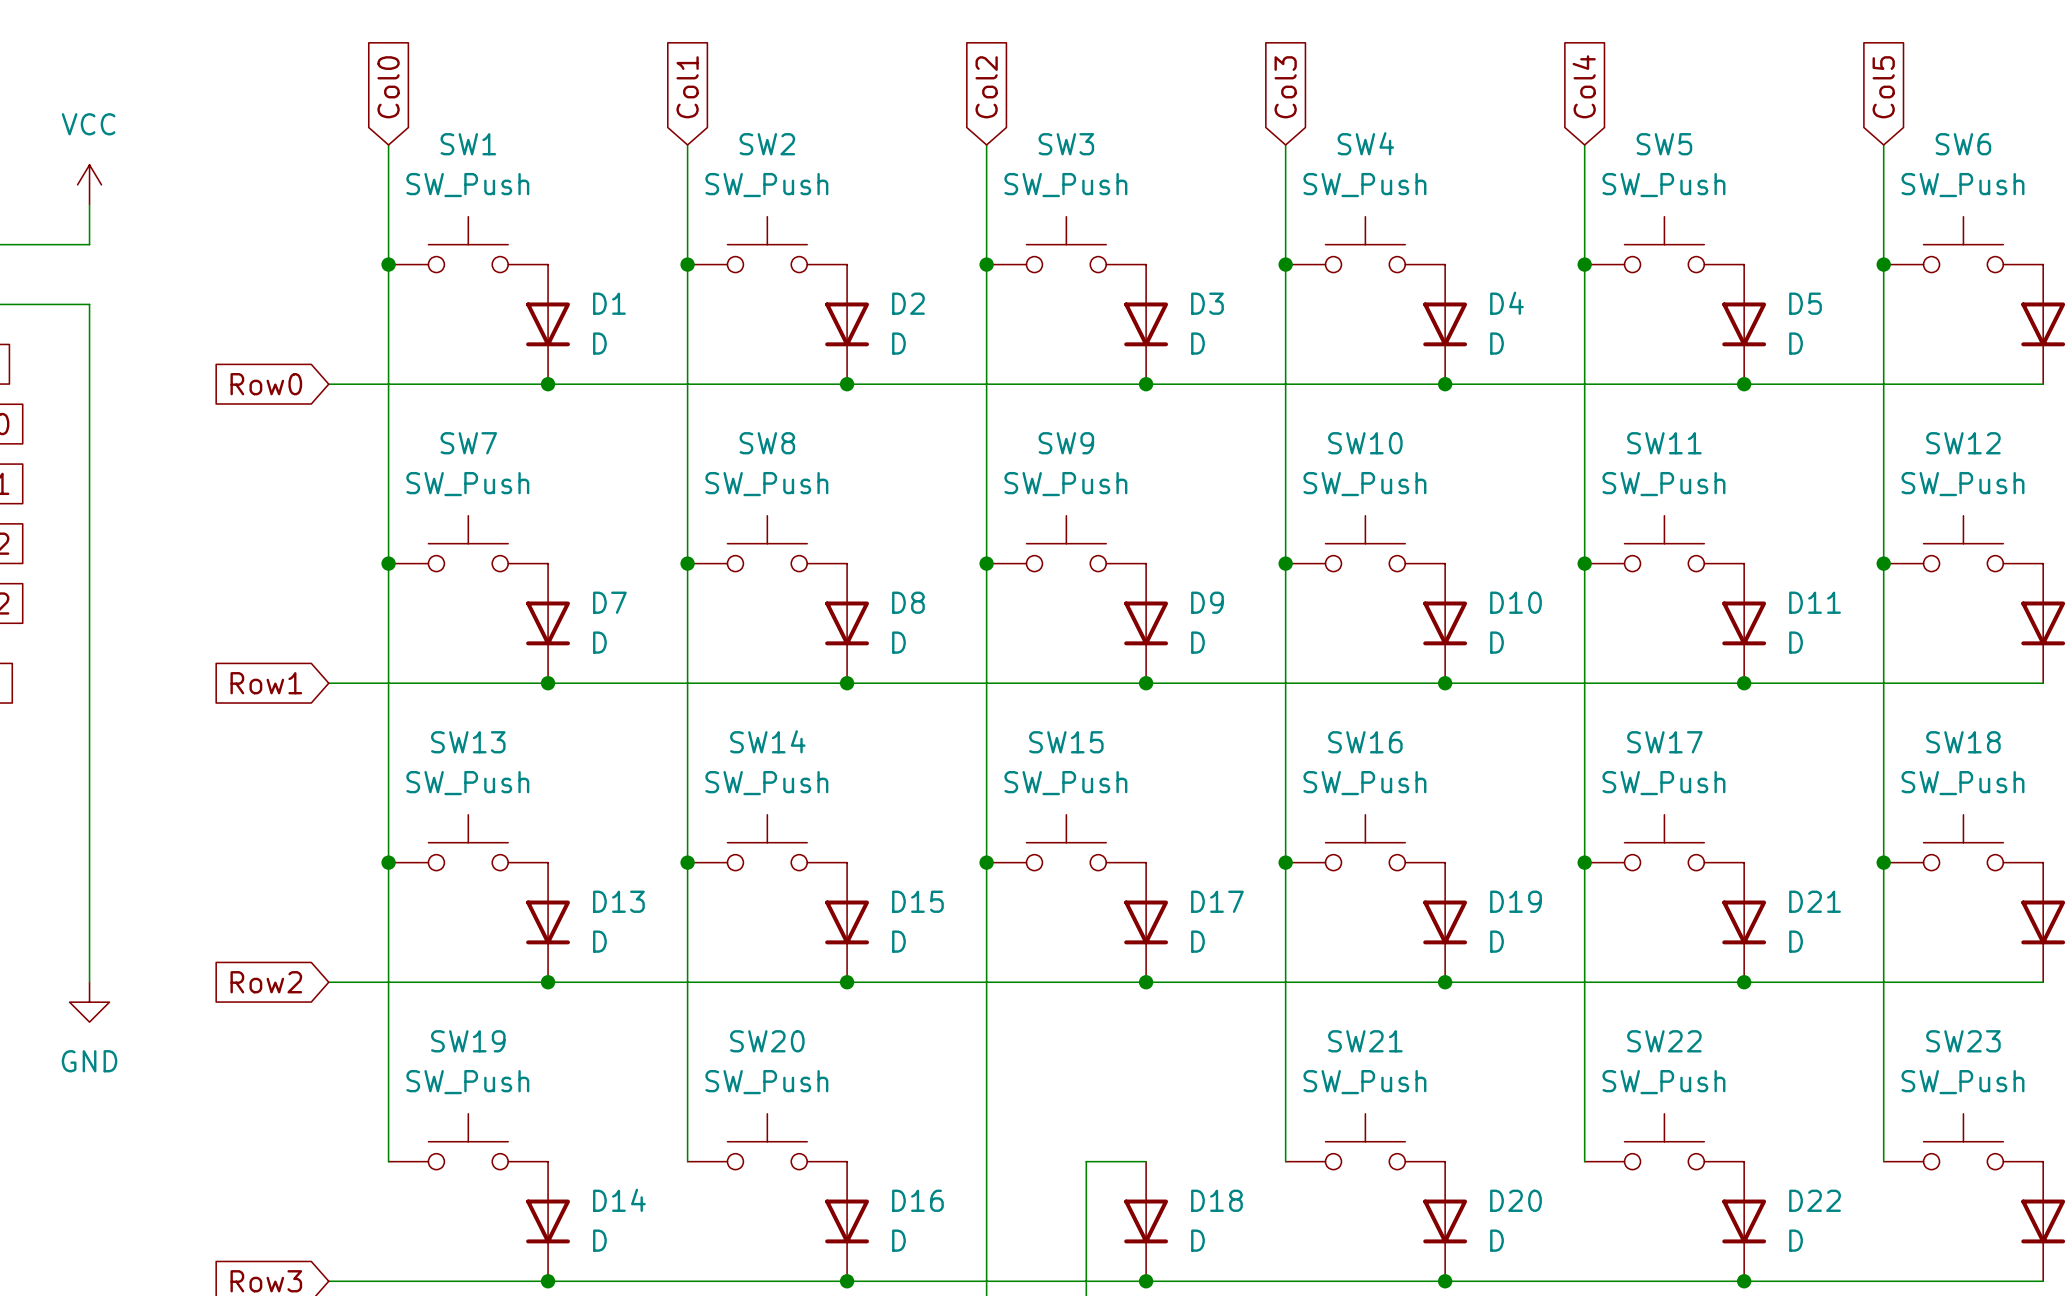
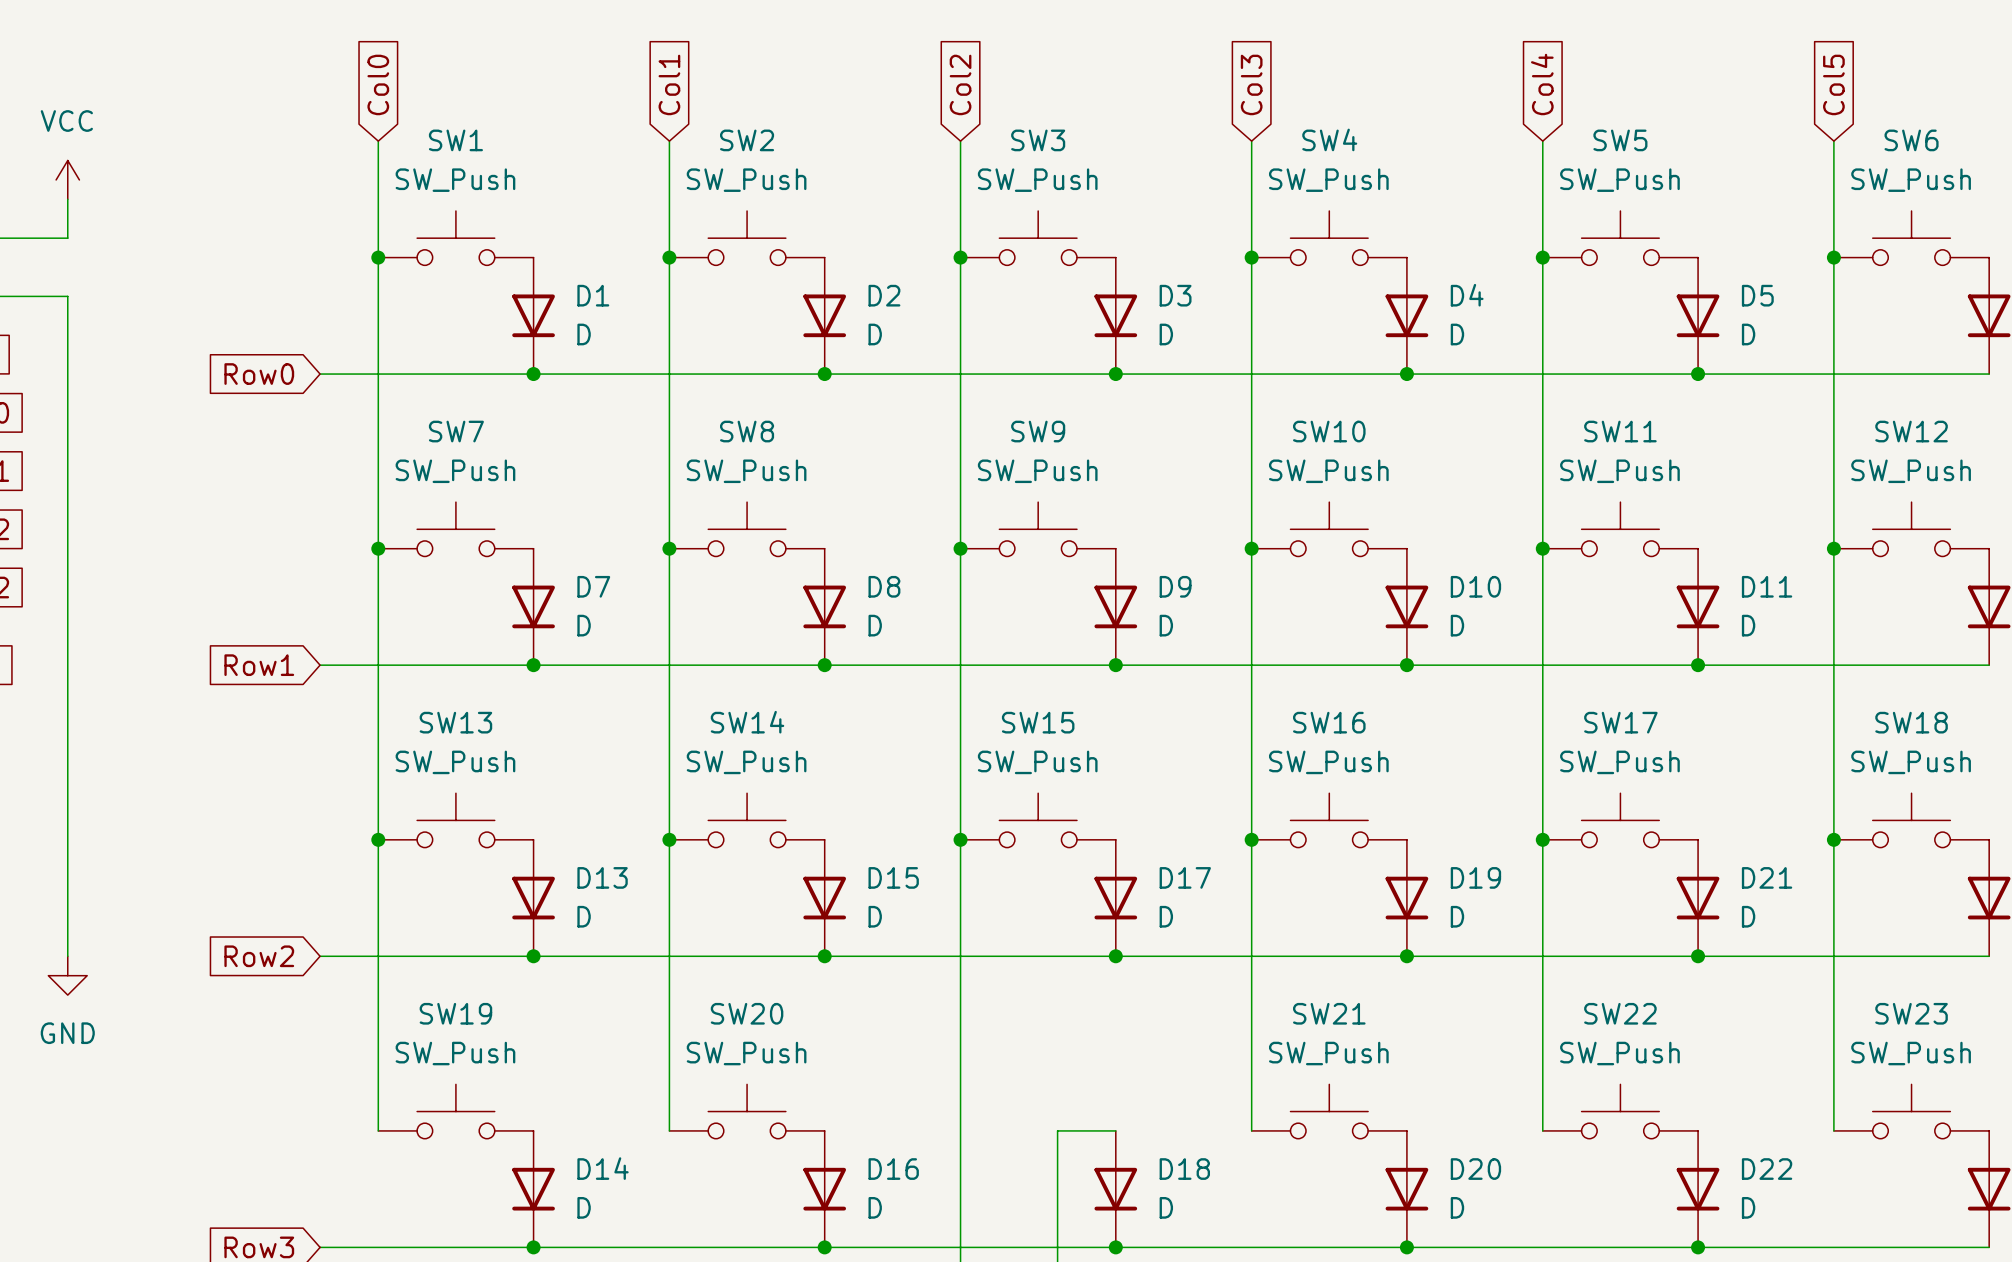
power symbol position: VCC (89, 184) -> VCC (67, 179)
wire: (89, 204) (89, 244) (69, 244) -> (67, 199) (67, 238)
wire: (69, 304) (89, 304) (89, 982) -> (67, 296) (67, 956)
power symbol position: GND (89, 1002) -> GND (67, 975)

